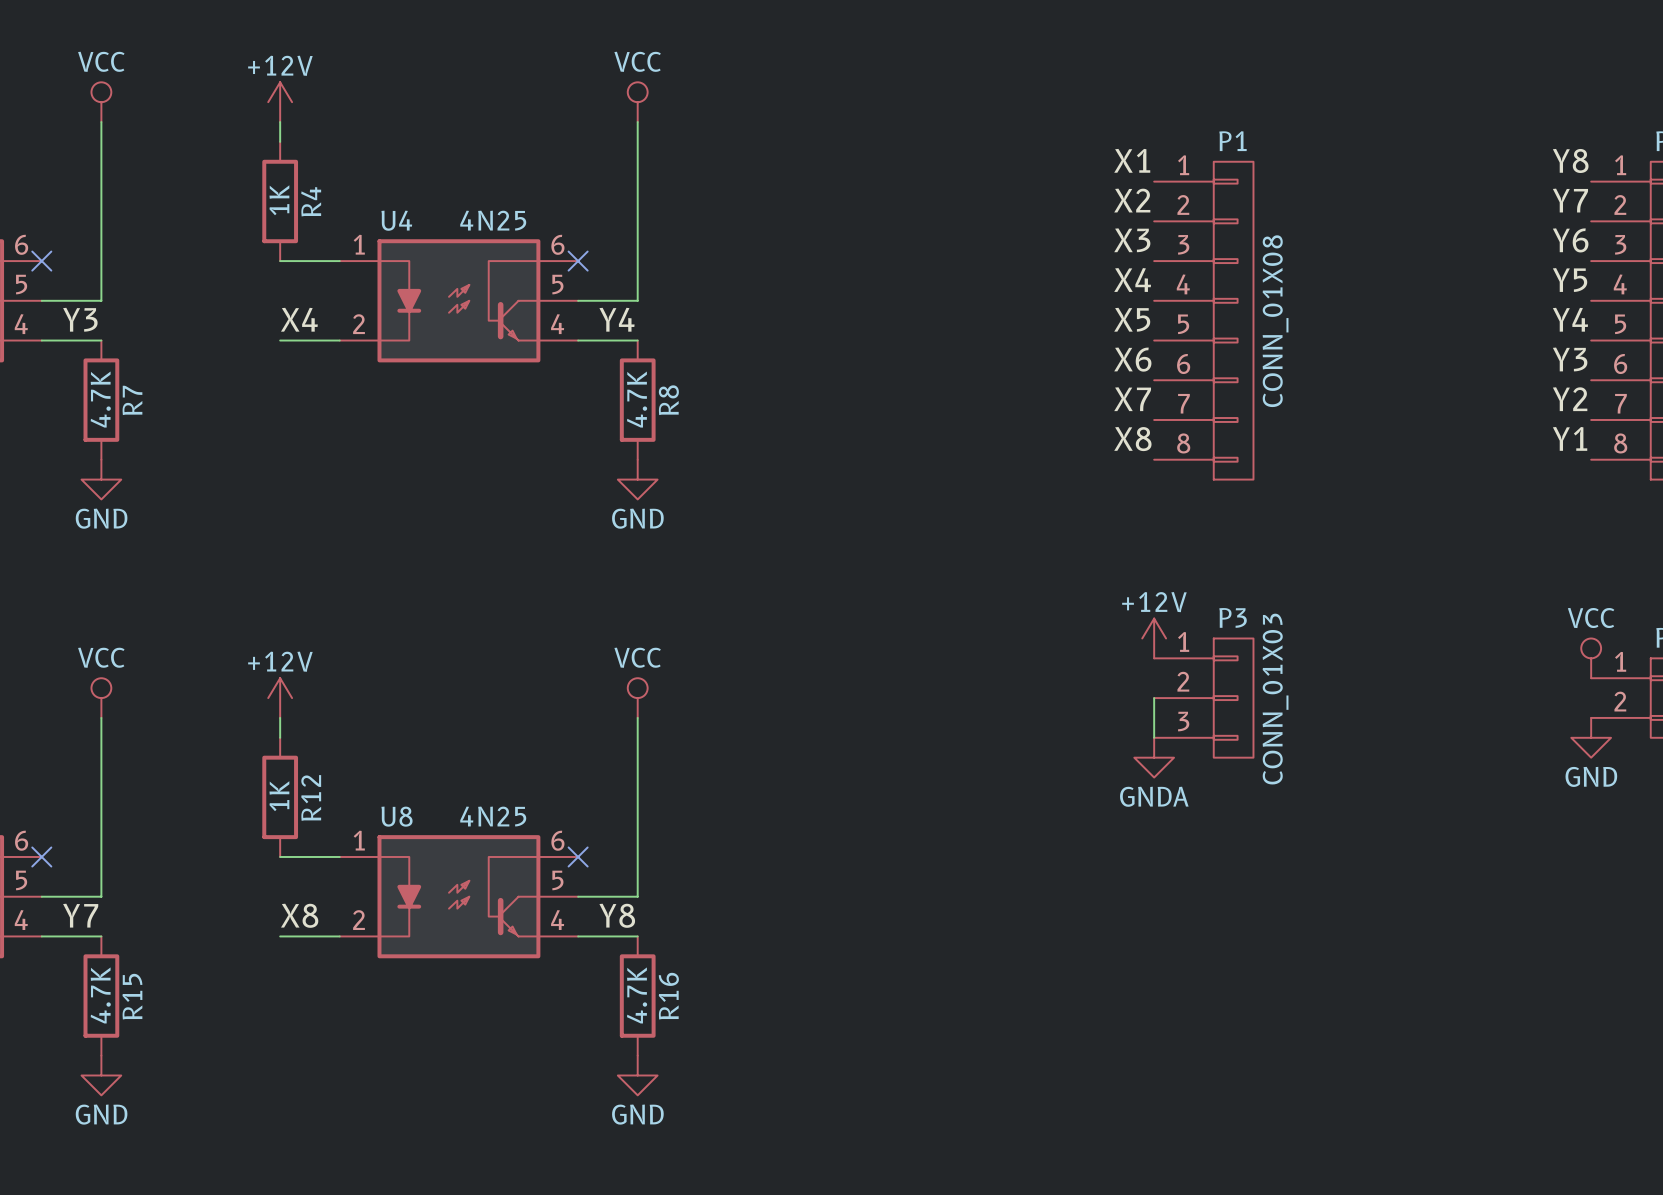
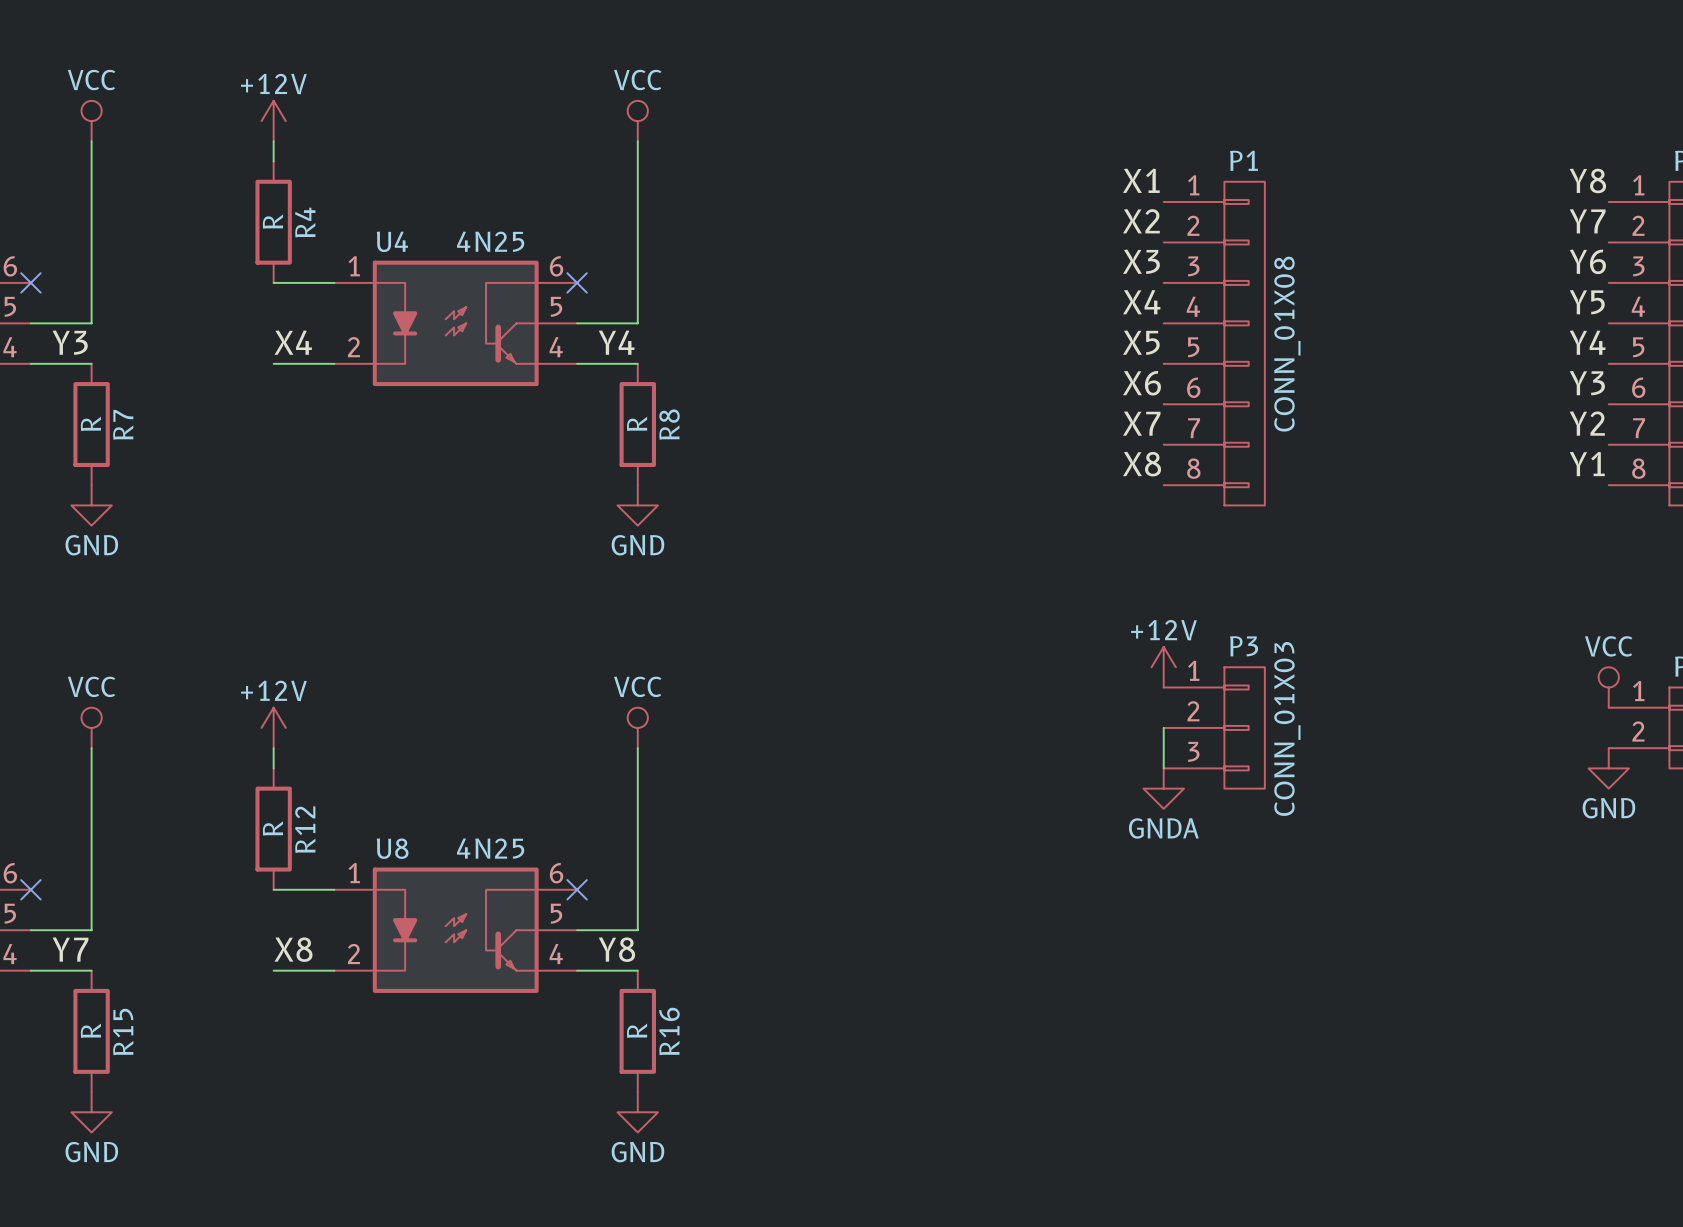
R4 value: 1K (279, 200) -> R (272, 221)
R7 value: 4.7K (100, 399) -> R (90, 423)
R8 value: 4.7K (637, 399) -> R (637, 423)
R12 value: 1K (279, 796) -> R (272, 828)
R15 value: 4.7K (100, 995) -> R (90, 1030)
R16 value: 4.7K (637, 995) -> R (637, 1030)

